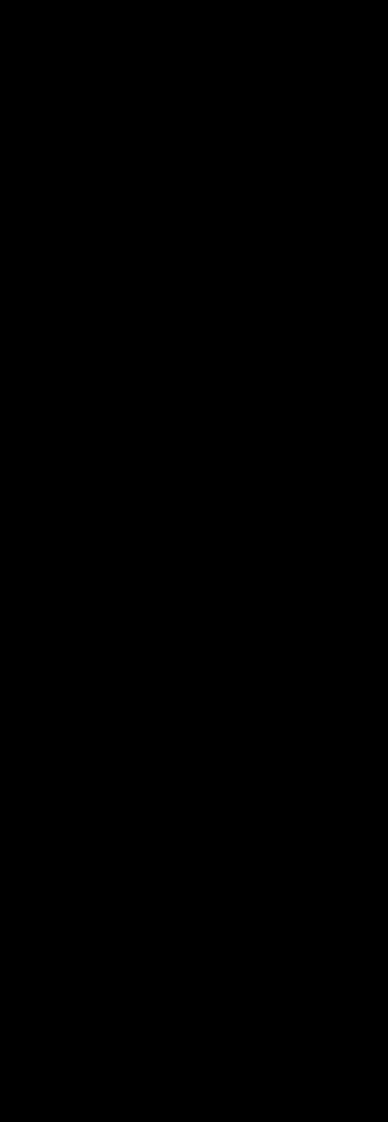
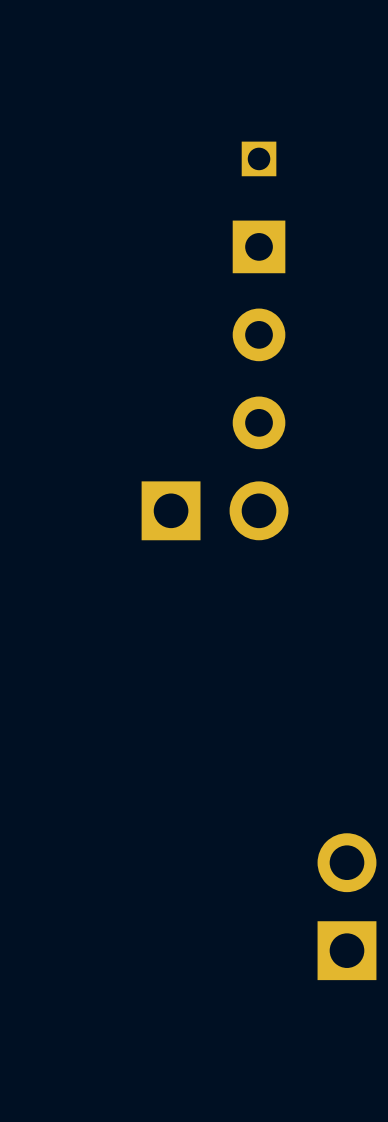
part: none -> (259, 158)
part: none -> (259, 334)
part: none -> (215, 510)
part: none -> (347, 906)

